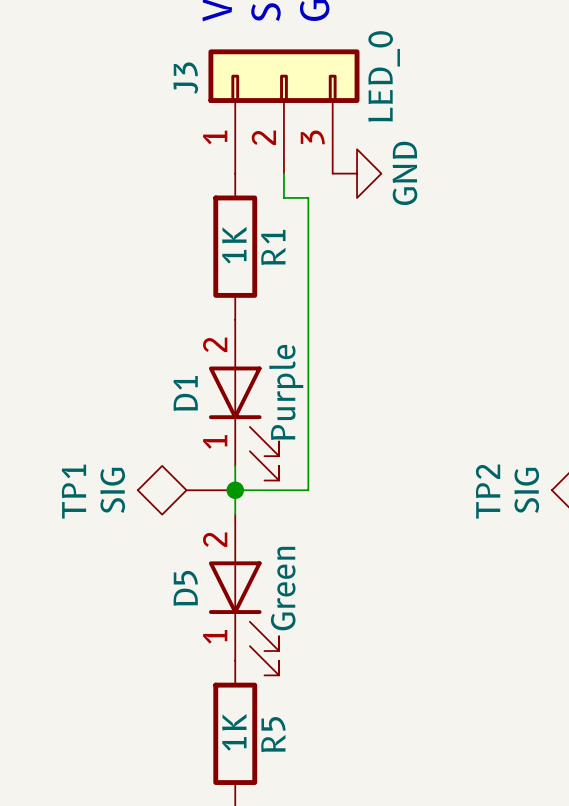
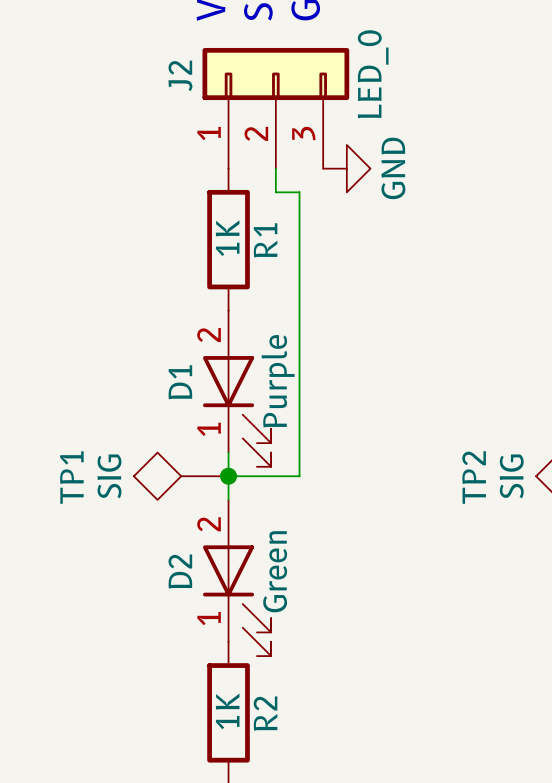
J3 name: J3 (185, 78) -> J2 (180, 75)
D5 name: D5 (185, 588) -> D2 (180, 571)
R5 name: R5 (273, 734) -> R2 (265, 713)

